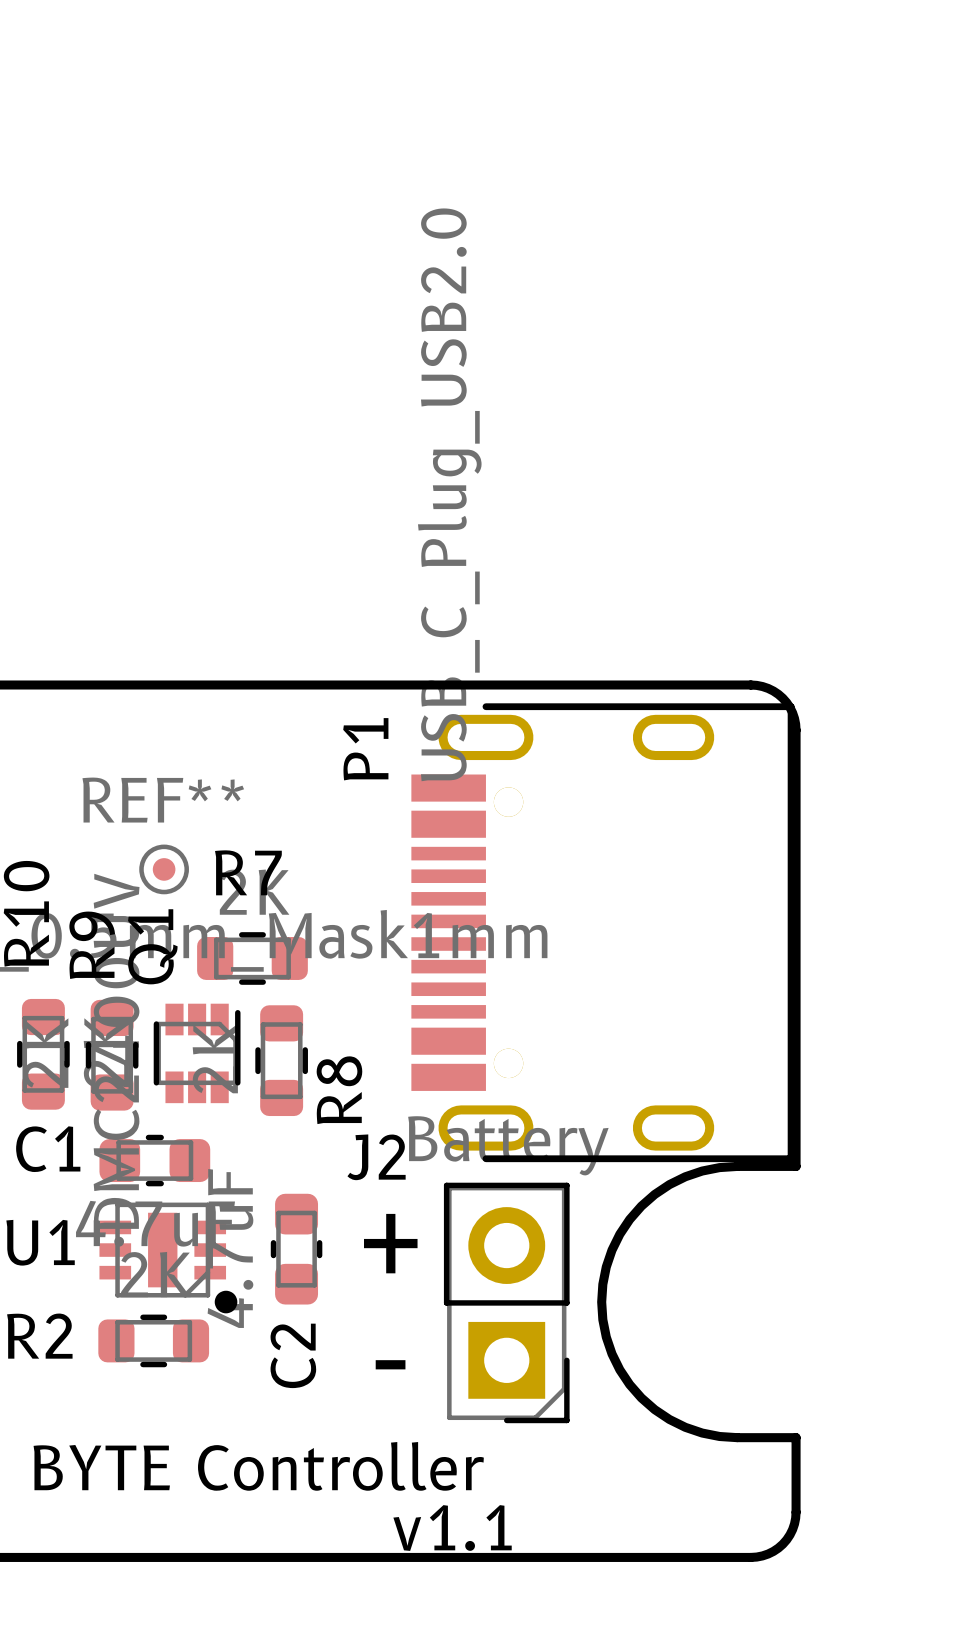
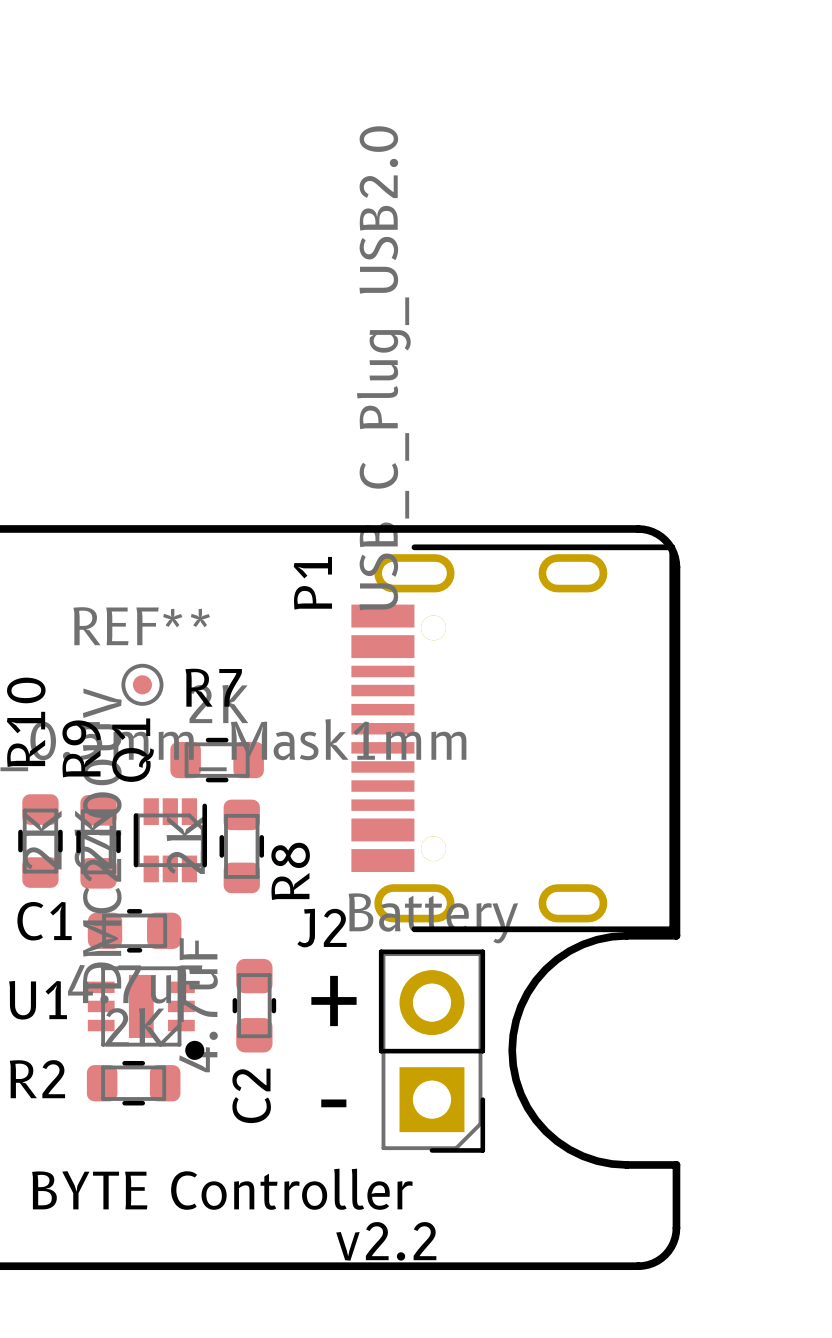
text: v1.1 (452, 1528) -> v2.2 (386, 1241)

